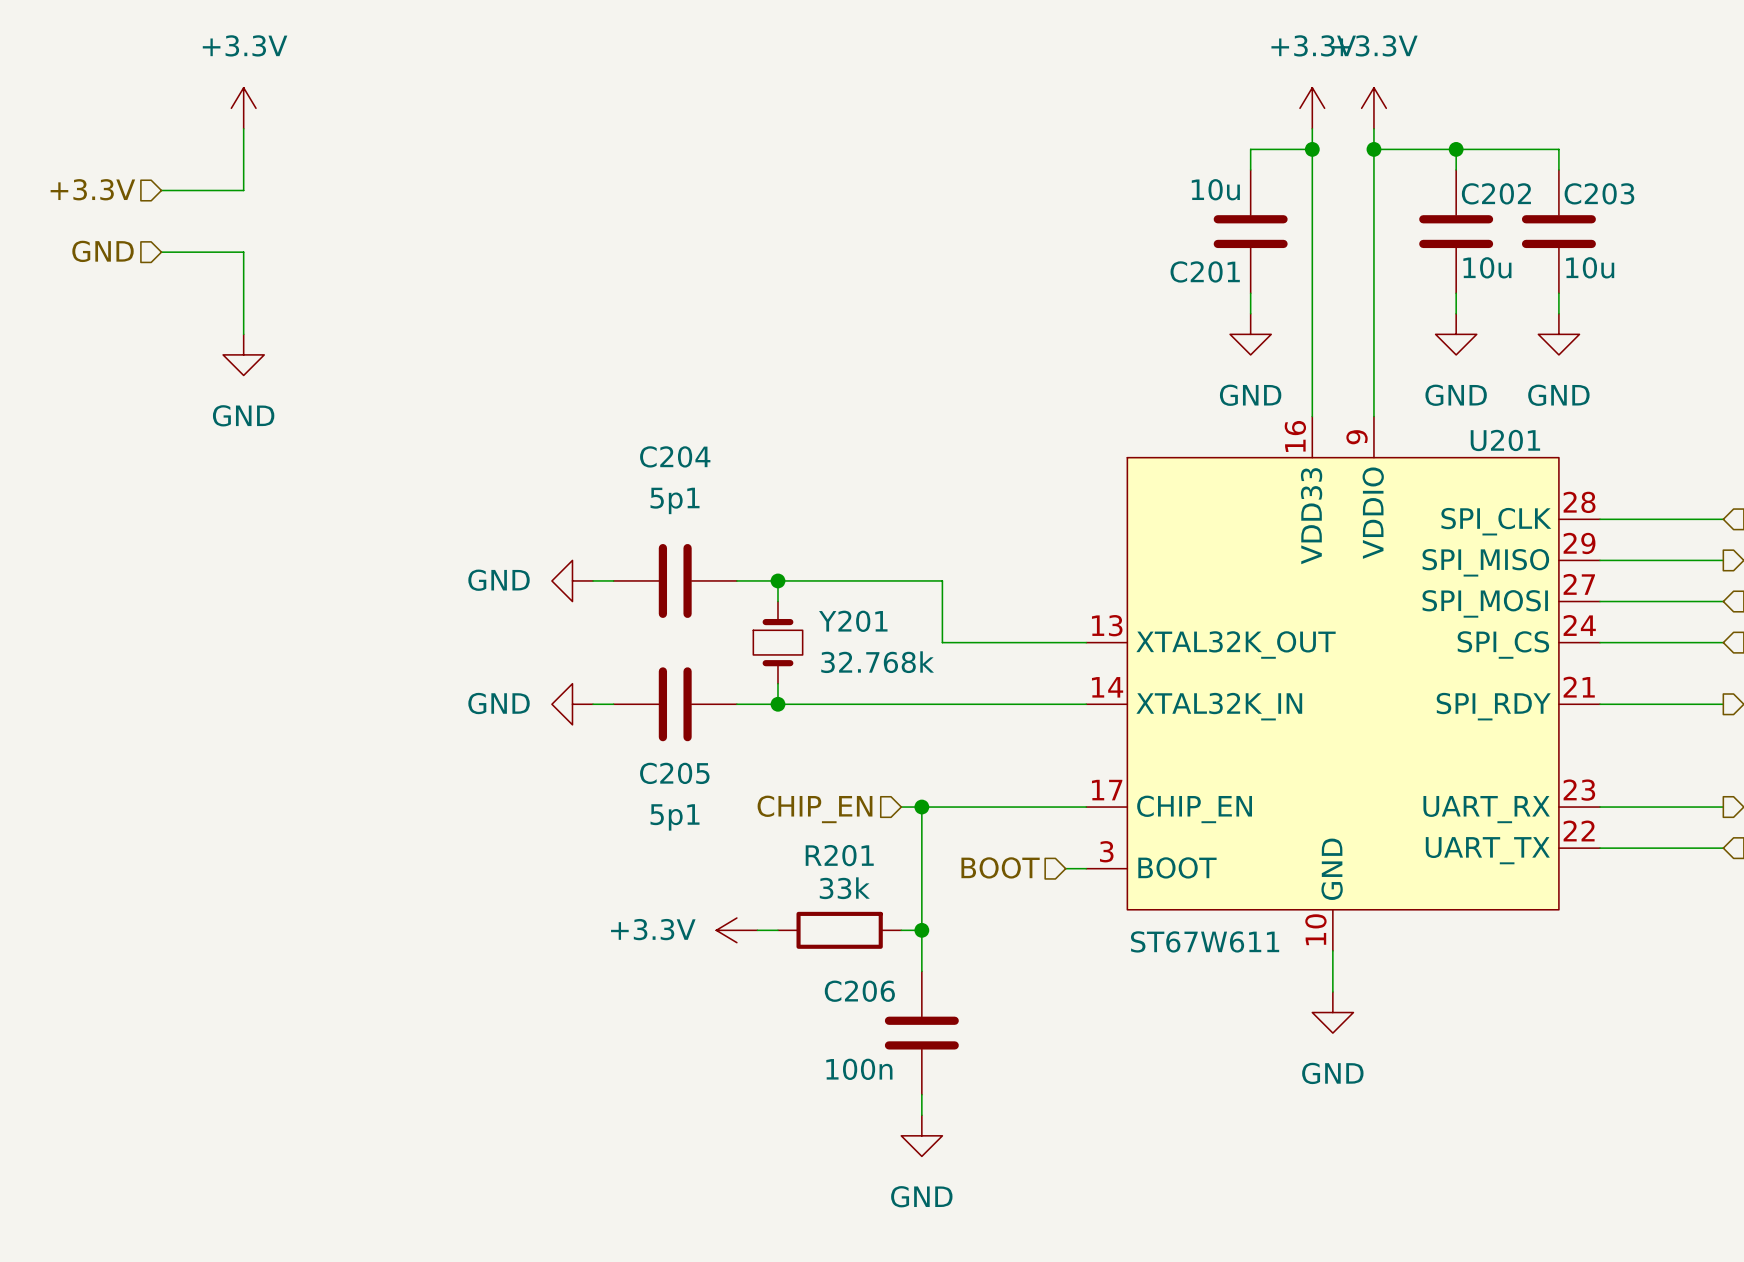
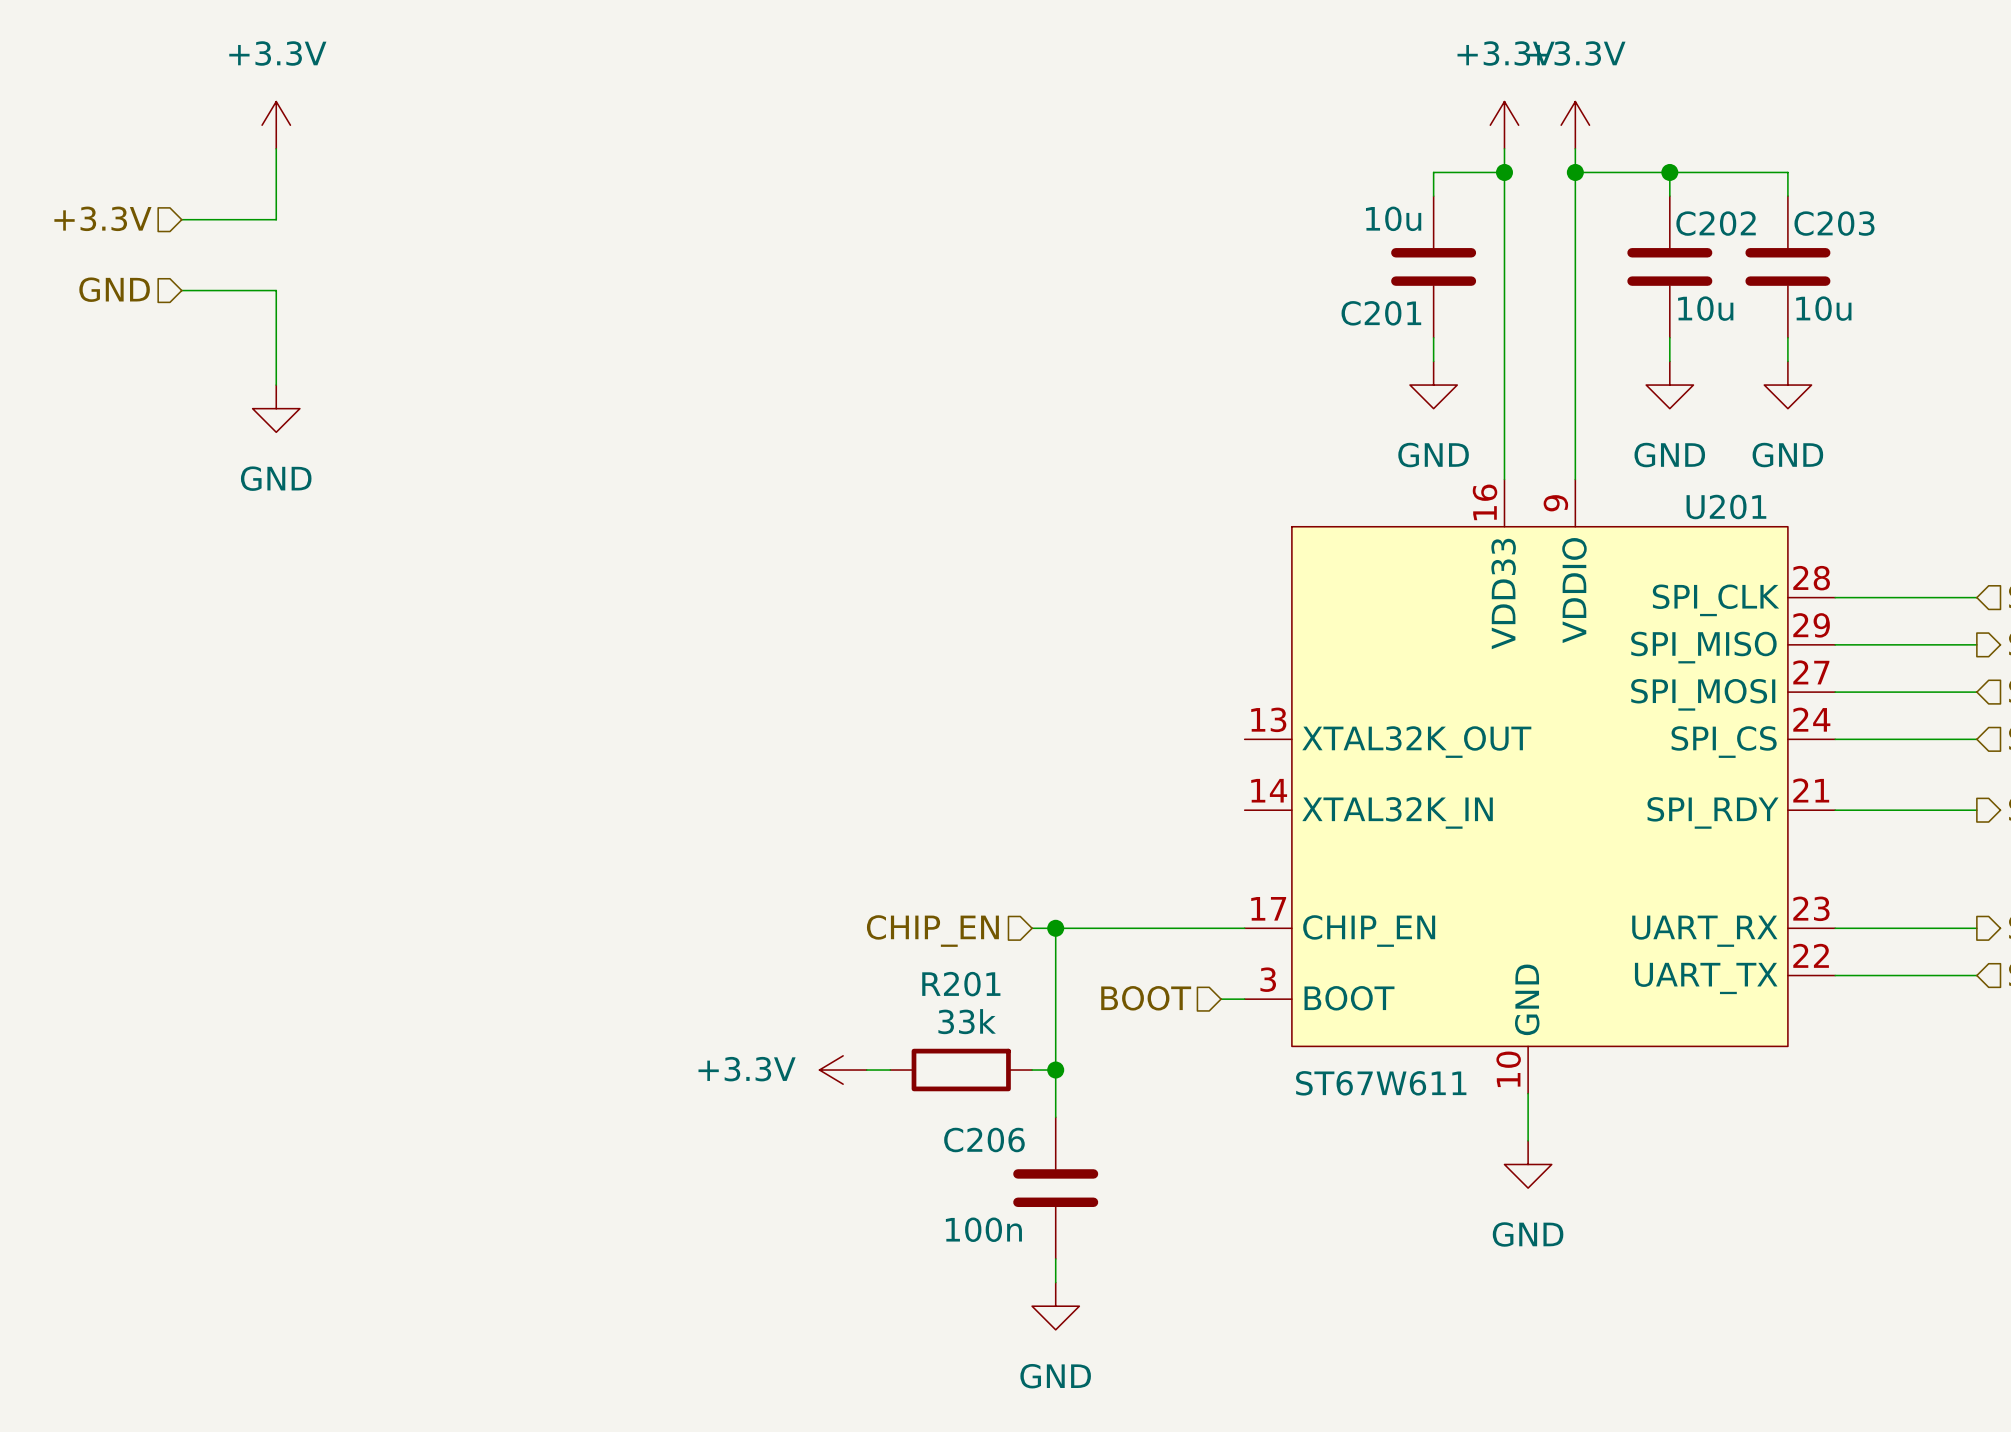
power symbol: GND (572, 580) -> none
wire: (593, 580) (613, 580) -> none
C204: 5p1 (675, 580) -> none
wire: (736, 580) (942, 580) (942, 642) (1086, 642) -> none
wire: (777, 580) (777, 601) -> none
junction: (777, 580) -> none
Y201: 32.768k (777, 642) -> none
wire: (777, 683) (777, 704) -> none
power symbol: GND (572, 704) -> none
wire: (593, 704) (613, 704) -> none
C205: 5p1 (675, 704) -> none
wire: (736, 704) (1086, 704) -> none
junction: (777, 704) -> none

